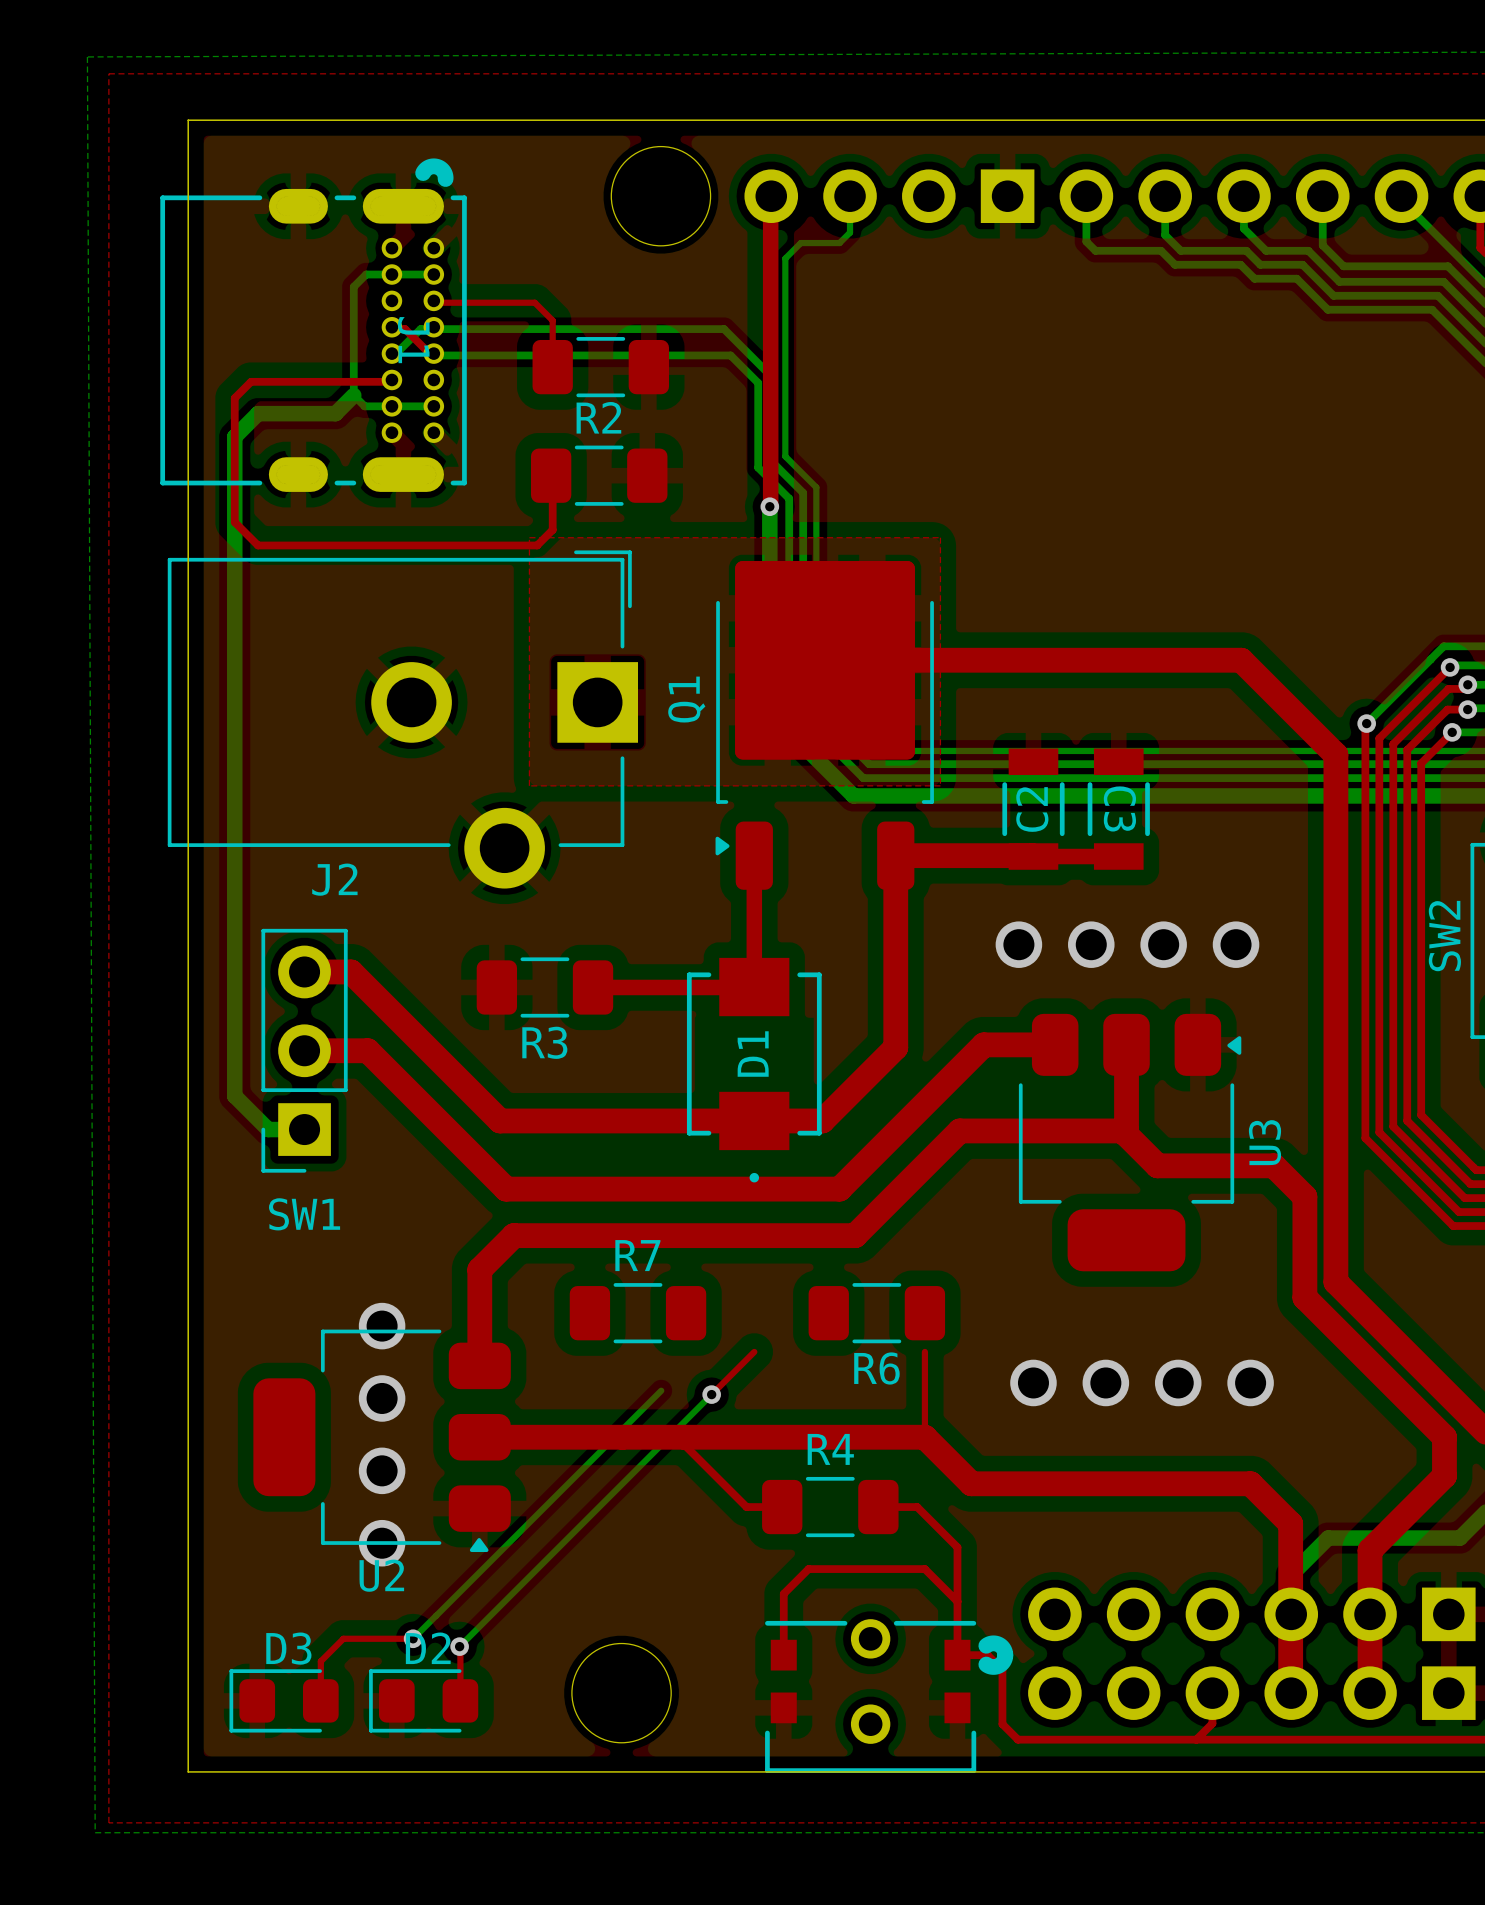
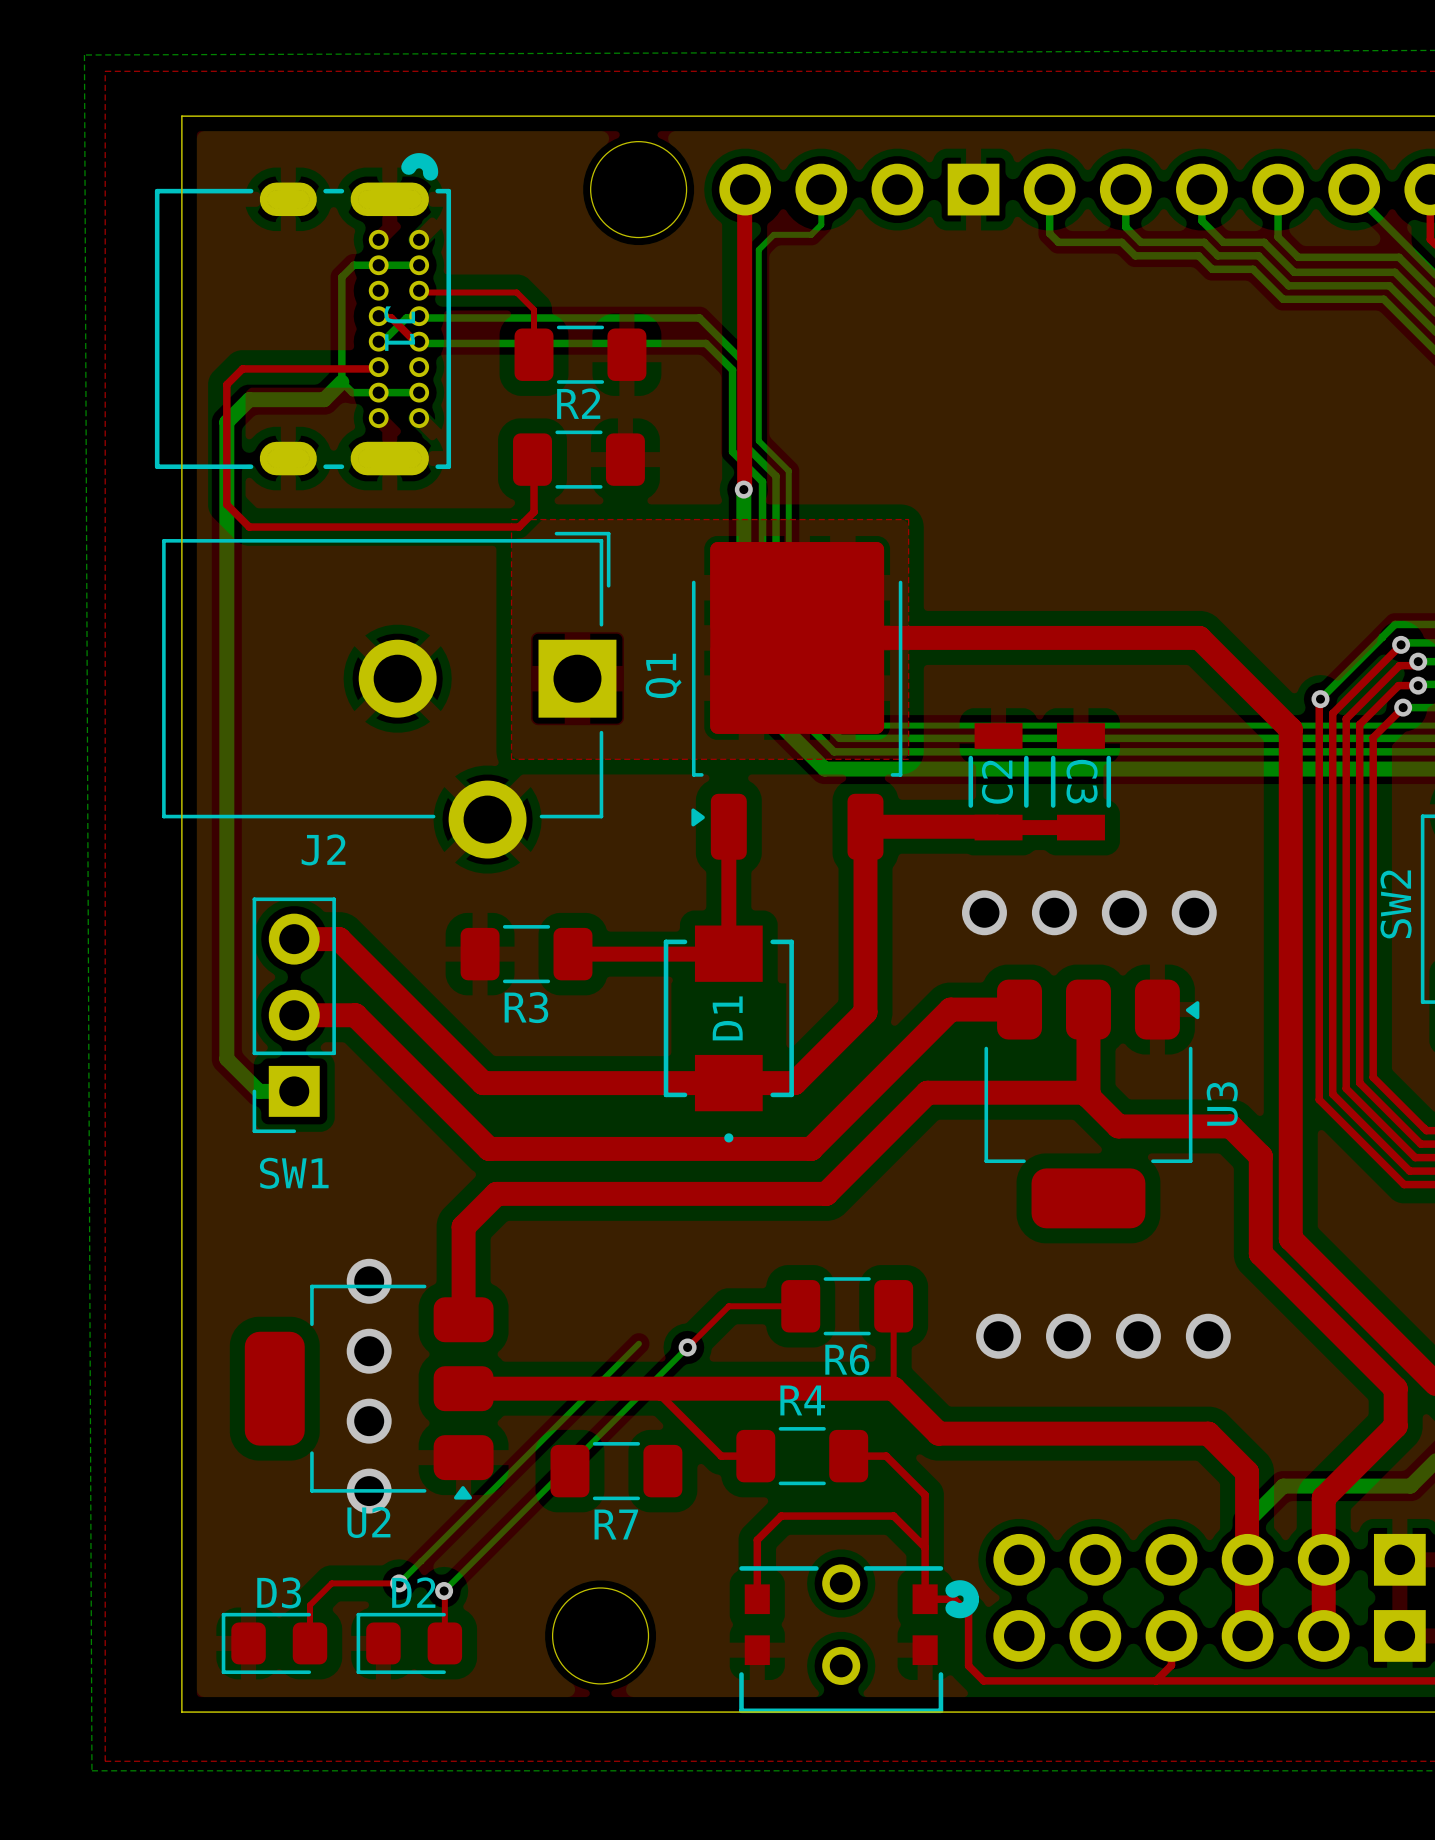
R7 name position: R7 (637, 1255) -> R7 (616, 1524)
R7 position: (637, 1313) -> (616, 1471)
R6 position: (876, 1313) -> (847, 1306)
top track: none -> (728, 1306) (800, 1306)

